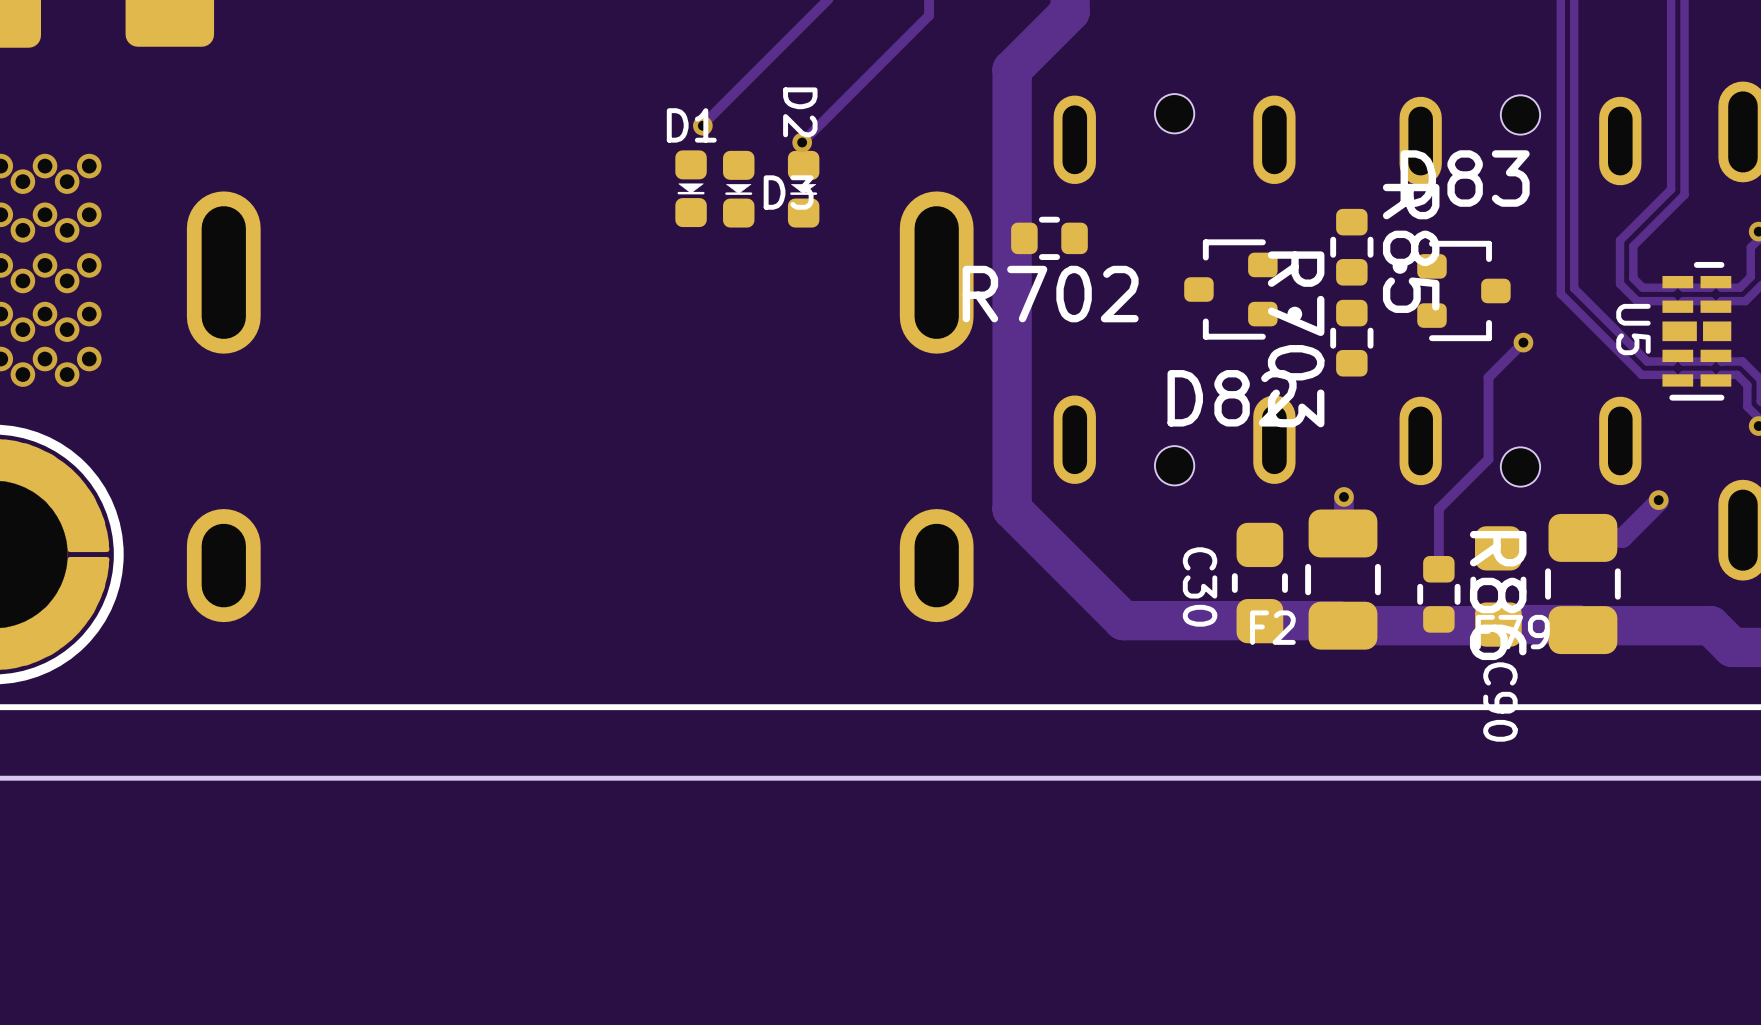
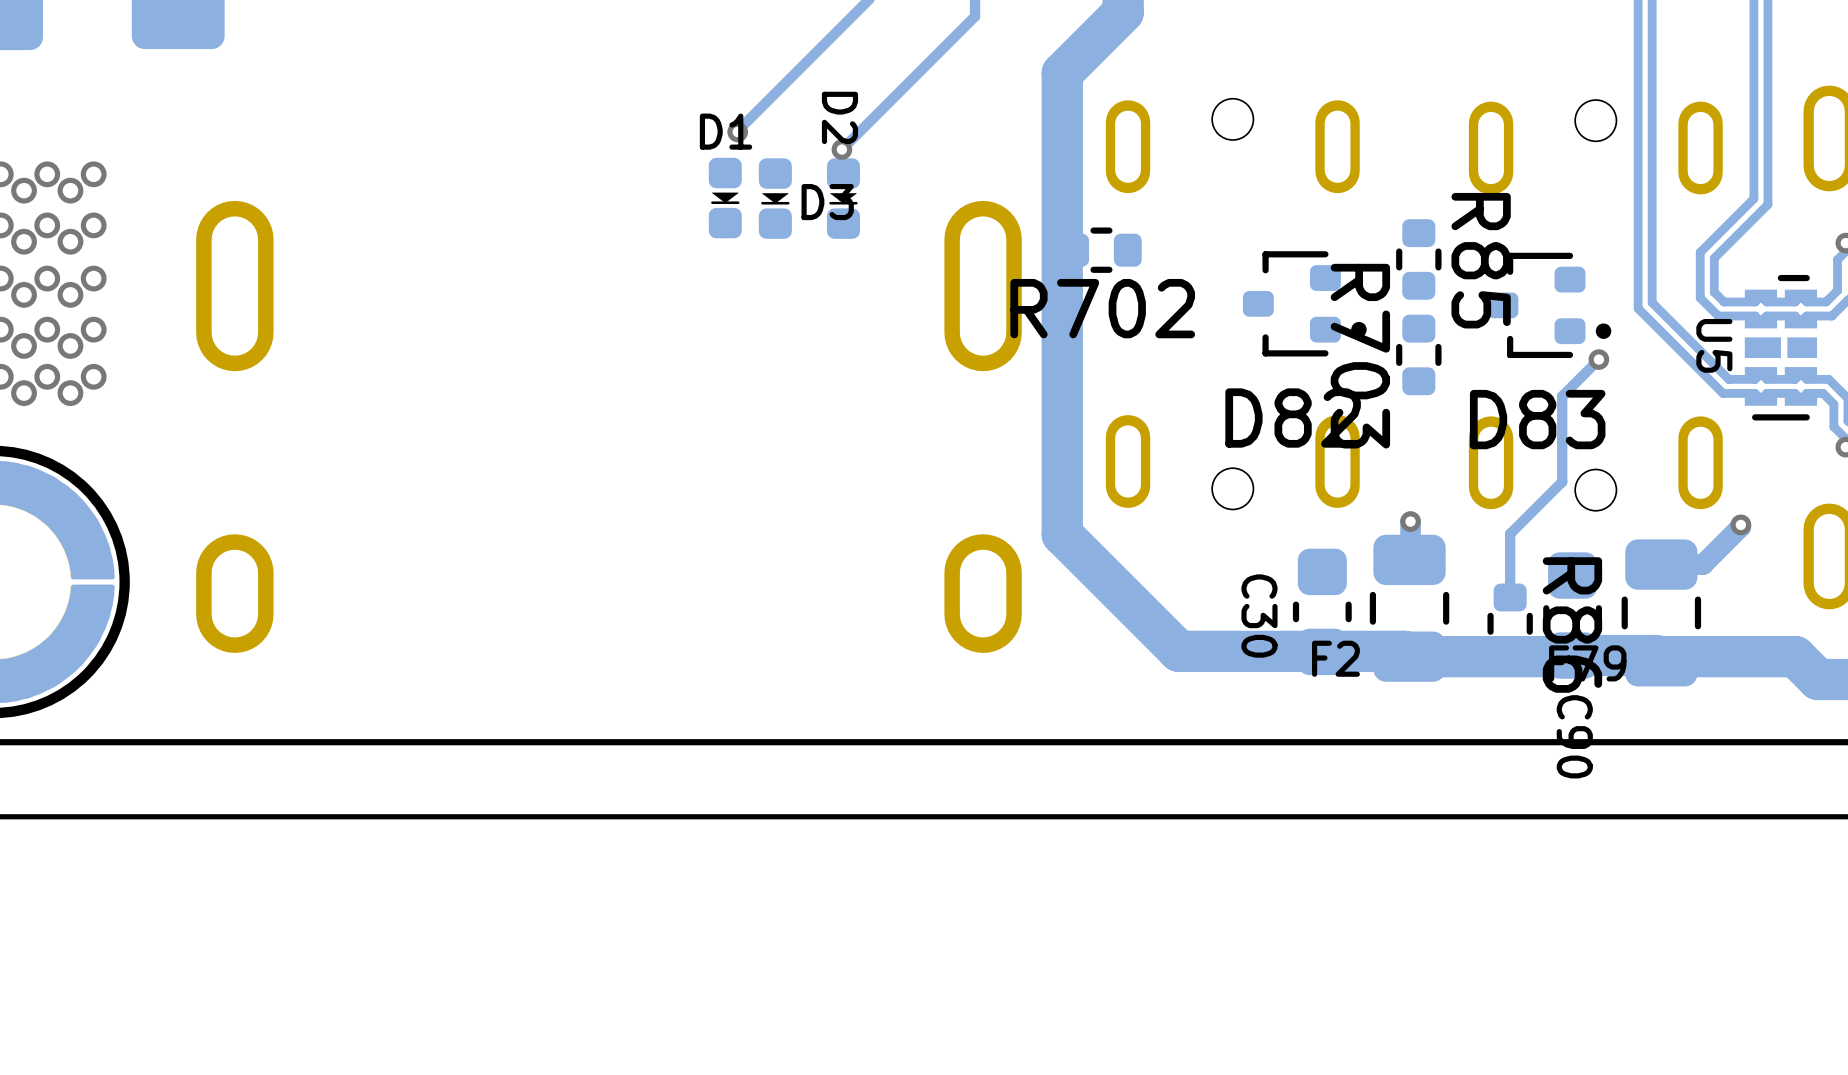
D83 rotation: 0° (1451, 290) -> 180° (1549, 305)

